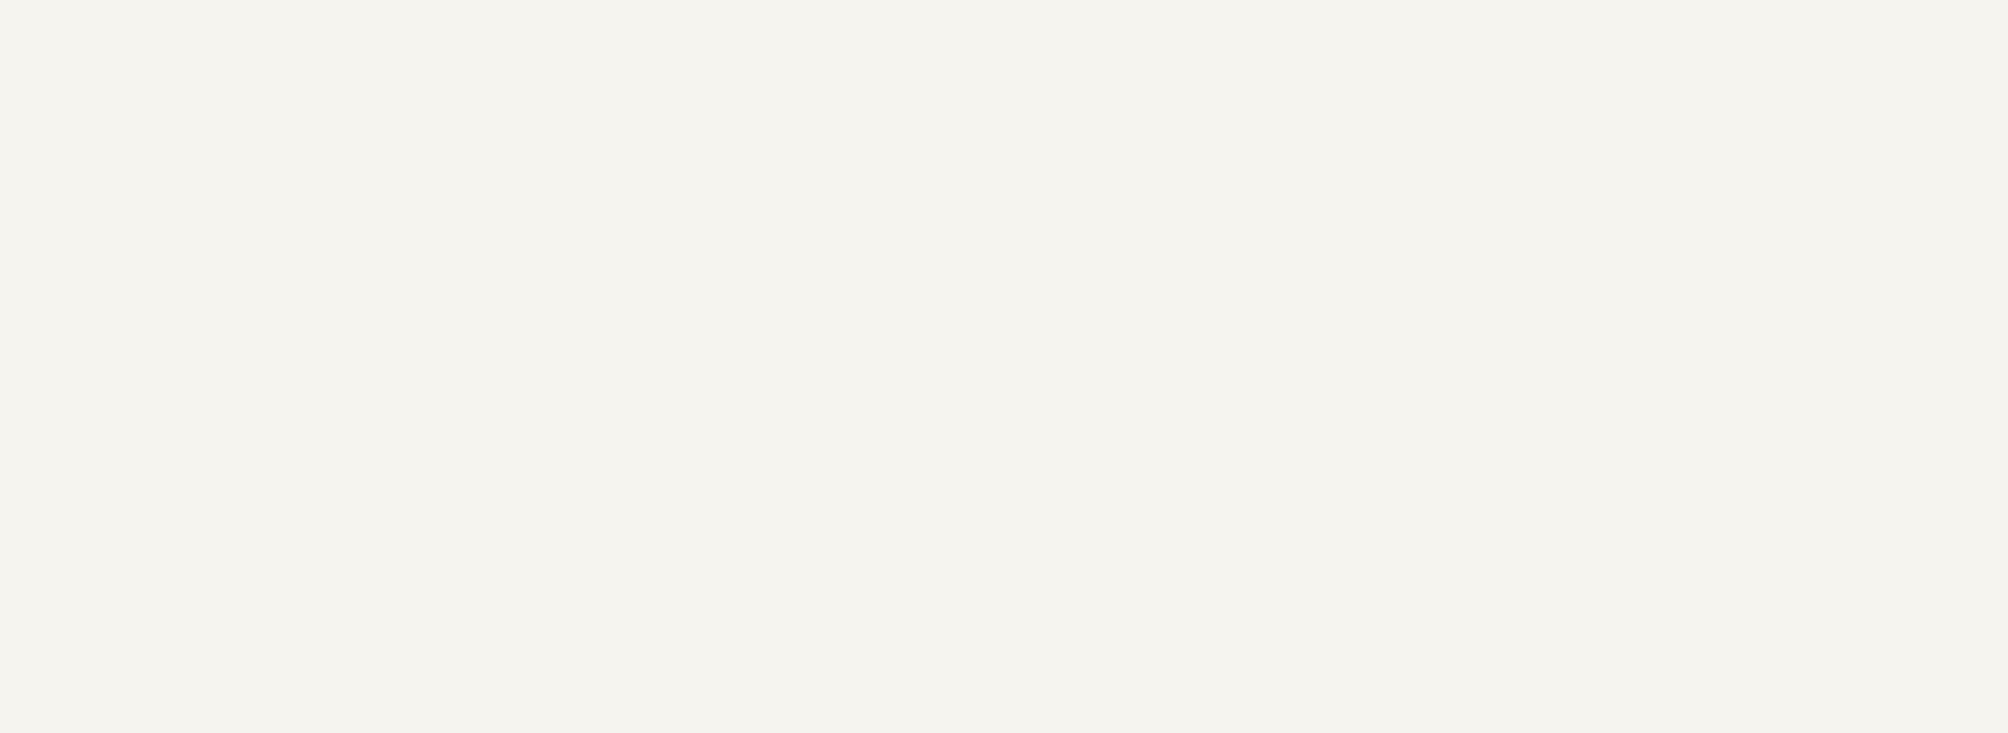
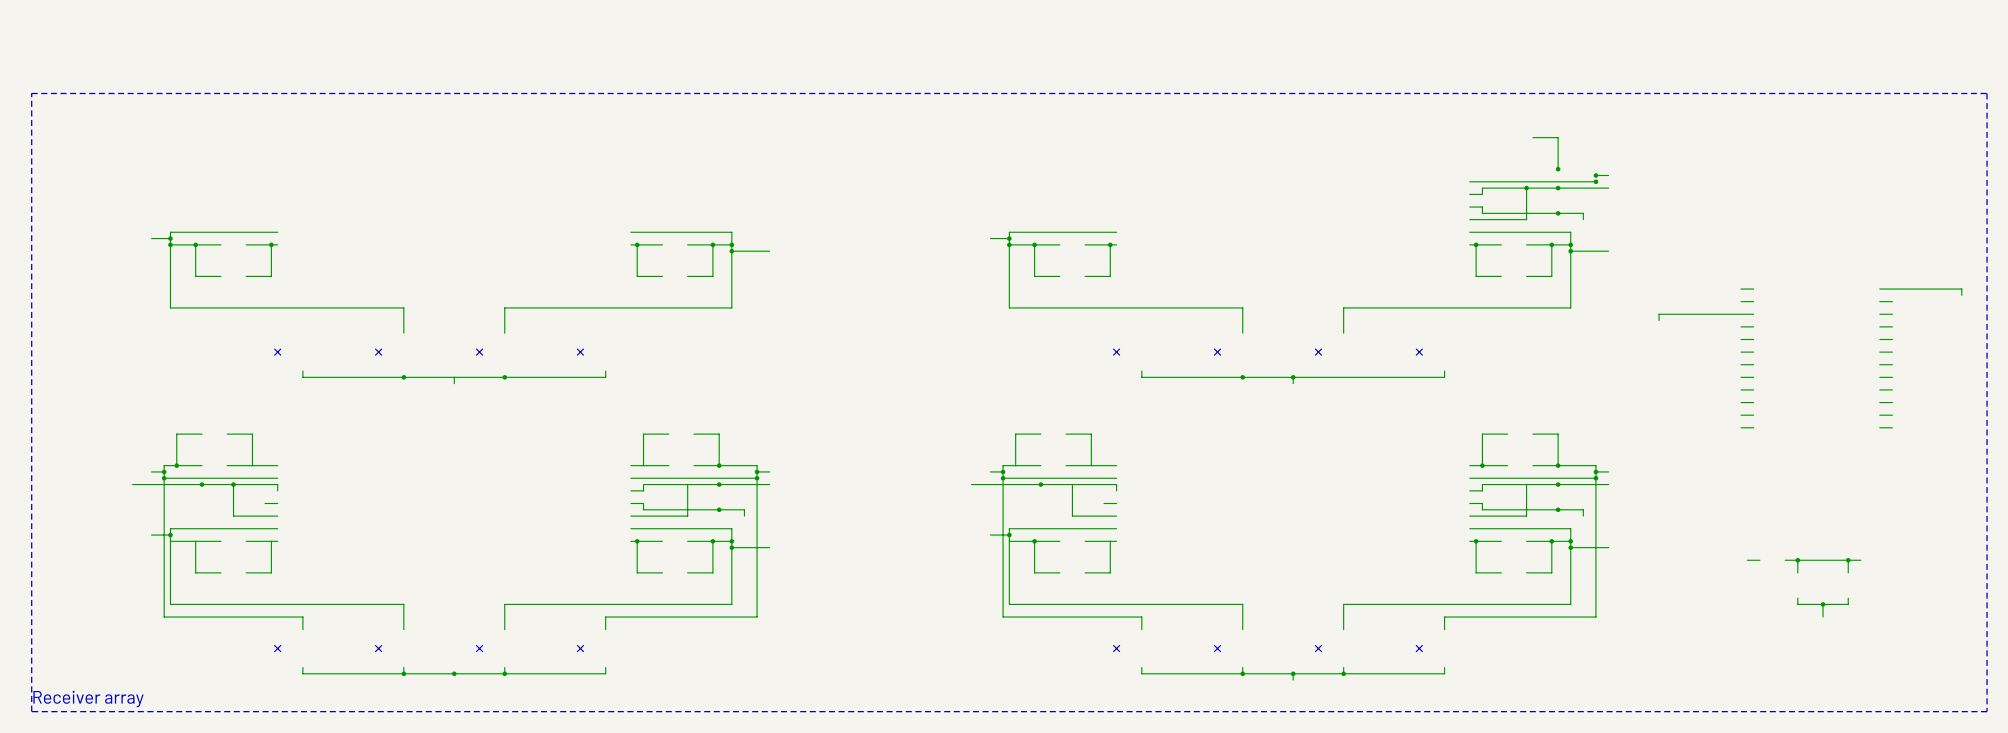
line: none -> (31, 93) (1987, 93) (1987, 711) (31, 711) (31, 93)
wire: none -> (1532, 137) (1558, 137) (1558, 169)
junction: none -> (1558, 169)
wire: none -> (1595, 175) (1608, 175)
junction: none -> (1595, 175)
wire: none -> (1469, 181) (1595, 181)
junction: none -> (1595, 181)
wire: none -> (1526, 188) (1526, 219) (1469, 219)
junction: none -> (1526, 188)
junction: none -> (1558, 188)
wire: none -> (1608, 188) (1482, 188) (1482, 194) (1469, 194)
wire: none -> (1469, 207) (1482, 207) (1482, 213) (1583, 213) (1583, 219)
junction: none -> (1558, 213)
wire: none -> (277, 232) (170, 232) (170, 307) (403, 307) (403, 333)
wire: none -> (630, 232) (731, 232) (731, 307) (504, 307) (504, 333)
wire: none -> (1116, 232) (1009, 232) (1009, 307) (1242, 307) (1242, 333)
wire: none -> (1469, 232) (1570, 232) (1570, 307) (1343, 307) (1343, 333)
wire: none -> (151, 238) (170, 238)
junction: none -> (170, 238)
wire: none -> (990, 238) (1009, 238)
junction: none -> (1009, 238)
wire: none -> (170, 244) (220, 244)
junction: none -> (170, 244)
wire: none -> (195, 244) (195, 276) (220, 276)
junction: none -> (195, 244)
wire: none -> (246, 244) (277, 244)
wire: none -> (271, 244) (271, 276) (246, 276)
junction: none -> (271, 244)
wire: none -> (630, 244) (662, 244)
wire: none -> (637, 244) (637, 276) (662, 276)
junction: none -> (637, 244)
wire: none -> (687, 244) (731, 244)
wire: none -> (712, 244) (712, 276) (687, 276)
junction: none -> (712, 244)
junction: none -> (731, 244)
wire: none -> (1009, 244) (1059, 244)
junction: none -> (1009, 244)
wire: none -> (1034, 244) (1034, 276) (1059, 276)
junction: none -> (1034, 244)
wire: none -> (1085, 244) (1116, 244)
wire: none -> (1110, 244) (1110, 276) (1085, 276)
junction: none -> (1110, 244)
wire: none -> (1469, 244) (1501, 244)
wire: none -> (1476, 244) (1476, 276) (1501, 276)
junction: none -> (1476, 244)
wire: none -> (1526, 244) (1570, 244)
wire: none -> (1551, 244) (1551, 276) (1526, 276)
junction: none -> (1551, 244)
junction: none -> (1570, 244)
wire: none -> (731, 251) (769, 251)
junction: none -> (731, 251)
wire: none -> (1570, 251) (1608, 251)
junction: none -> (1570, 251)
wire: none -> (1741, 289) (1753, 289)
wire: none -> (1879, 289) (1961, 289) (1961, 295)
wire: none -> (1741, 301) (1753, 301)
wire: none -> (1879, 301) (1892, 301)
wire: none -> (1753, 314) (1659, 314) (1659, 320)
wire: none -> (1879, 314) (1892, 314)
wire: none -> (1741, 326) (1753, 326)
wire: none -> (1879, 326) (1892, 326)
wire: none -> (1741, 339) (1753, 339)
wire: none -> (1879, 339) (1892, 339)
no-connect mark: none -> (277, 352)
no-connect mark: none -> (378, 352)
no-connect mark: none -> (479, 352)
no-connect mark: none -> (580, 352)
no-connect mark: none -> (1116, 352)
no-connect mark: none -> (1217, 352)
no-connect mark: none -> (1318, 352)
no-connect mark: none -> (1419, 352)
wire: none -> (1741, 352) (1753, 352)
wire: none -> (1879, 352) (1892, 352)
wire: none -> (1741, 364) (1753, 364)
wire: none -> (1879, 364) (1892, 364)
wire: none -> (302, 371) (302, 377) (605, 377) (605, 371)
wire: none -> (1141, 371) (1141, 377) (1444, 377) (1444, 371)
junction: none -> (403, 377)
wire: none -> (454, 377) (454, 383)
junction: none -> (504, 377)
junction: none -> (1242, 377)
wire: none -> (1293, 377) (1293, 383)
junction: none -> (1293, 377)
wire: none -> (1741, 377) (1753, 377)
wire: none -> (1879, 377) (1892, 377)
wire: none -> (1741, 389) (1753, 389)
wire: none -> (1879, 389) (1892, 389)
wire: none -> (1741, 402) (1753, 402)
wire: none -> (1879, 402) (1892, 402)
wire: none -> (1741, 415) (1753, 415)
wire: none -> (1879, 415) (1892, 415)
wire: none -> (1741, 427) (1753, 427)
wire: none -> (1879, 427) (1892, 427)
wire: none -> (202, 434) (176, 434) (176, 465)
wire: none -> (227, 434) (252, 434) (252, 465)
wire: none -> (668, 434) (643, 434) (643, 465)
wire: none -> (693, 434) (719, 434) (719, 465)
wire: none -> (1040, 434) (1015, 434) (1015, 465)
wire: none -> (1066, 434) (1091, 434) (1091, 465)
wire: none -> (1507, 434) (1482, 434) (1482, 465)
wire: none -> (1532, 434) (1558, 434) (1558, 465)
junction: none -> (176, 465)
wire: none -> (202, 465) (164, 465) (164, 617) (302, 617) (302, 629)
wire: none -> (227, 465) (277, 465)
wire: none -> (630, 465) (668, 465)
wire: none -> (693, 465) (757, 465) (757, 617) (605, 617) (605, 629)
junction: none -> (719, 465)
wire: none -> (1040, 465) (1003, 465) (1003, 617) (1141, 617) (1141, 629)
wire: none -> (1066, 465) (1116, 465)
wire: none -> (1469, 465) (1507, 465)
junction: none -> (1482, 465)
wire: none -> (1532, 465) (1595, 465) (1595, 617) (1444, 617) (1444, 629)
junction: none -> (1558, 465)
wire: none -> (151, 471) (164, 471)
junction: none -> (164, 471)
wire: none -> (757, 471) (769, 471)
junction: none -> (757, 471)
wire: none -> (990, 471) (1003, 471)
junction: none -> (1003, 471)
wire: none -> (1595, 471) (1608, 471)
junction: none -> (1595, 471)
wire: none -> (164, 478) (277, 478)
junction: none -> (164, 478)
wire: none -> (630, 478) (757, 478)
junction: none -> (757, 478)
wire: none -> (1003, 478) (1116, 478)
junction: none -> (1003, 478)
wire: none -> (1469, 478) (1595, 478)
junction: none -> (1595, 478)
wire: none -> (132, 484) (277, 484) (277, 490)
junction: none -> (202, 484)
wire: none -> (233, 484) (233, 516) (277, 516)
junction: none -> (233, 484)
wire: none -> (687, 484) (687, 516) (630, 516)
junction: none -> (719, 484)
wire: none -> (769, 484) (643, 484) (643, 490) (630, 490)
wire: none -> (971, 484) (1116, 484) (1116, 490)
junction: none -> (1040, 484)
wire: none -> (1072, 484) (1072, 516) (1116, 516)
wire: none -> (1526, 484) (1526, 516) (1469, 516)
junction: none -> (1558, 484)
wire: none -> (1608, 484) (1482, 484) (1482, 490) (1469, 490)
wire: none -> (265, 503) (277, 503)
wire: none -> (630, 503) (643, 503) (643, 509) (744, 509) (744, 516)
wire: none -> (1103, 503) (1116, 503)
wire: none -> (1469, 503) (1482, 503) (1482, 509) (1583, 509) (1583, 516)
junction: none -> (719, 509)
junction: none -> (1558, 509)
wire: none -> (277, 528) (170, 528) (170, 604) (403, 604) (403, 629)
wire: none -> (630, 528) (731, 528) (731, 604) (504, 604) (504, 629)
wire: none -> (1116, 528) (1009, 528) (1009, 604) (1242, 604) (1242, 629)
wire: none -> (1469, 528) (1570, 528) (1570, 604) (1343, 604) (1343, 629)
wire: none -> (151, 535) (170, 535)
junction: none -> (170, 535)
wire: none -> (990, 535) (1009, 535)
junction: none -> (1009, 535)
wire: none -> (170, 541) (220, 541)
wire: none -> (195, 541) (195, 572) (220, 572)
wire: none -> (246, 541) (277, 541)
wire: none -> (271, 541) (271, 572) (246, 572)
wire: none -> (630, 541) (662, 541)
wire: none -> (637, 541) (637, 572) (662, 572)
junction: none -> (637, 541)
wire: none -> (687, 541) (731, 541)
wire: none -> (712, 541) (712, 572) (687, 572)
junction: none -> (712, 541)
junction: none -> (731, 541)
wire: none -> (1009, 541) (1059, 541)
wire: none -> (1034, 541) (1034, 572) (1059, 572)
junction: none -> (1034, 541)
wire: none -> (1085, 541) (1116, 541)
wire: none -> (1110, 541) (1110, 572) (1085, 572)
wire: none -> (1469, 541) (1501, 541)
wire: none -> (1476, 541) (1476, 572) (1501, 572)
junction: none -> (1476, 541)
wire: none -> (1526, 541) (1570, 541)
wire: none -> (1551, 541) (1551, 572) (1526, 572)
junction: none -> (1551, 541)
junction: none -> (1570, 541)
wire: none -> (731, 547) (769, 547)
junction: none -> (731, 547)
wire: none -> (1570, 547) (1608, 547)
junction: none -> (1570, 547)
wire: none -> (1747, 560) (1759, 560)
wire: none -> (1785, 560) (1860, 560)
wire: none -> (1797, 560) (1797, 572)
junction: none -> (1797, 560)
wire: none -> (1848, 560) (1848, 572)
junction: none -> (1848, 560)
wire: none -> (1797, 598) (1797, 604) (1848, 604) (1848, 598)
wire: none -> (1823, 604) (1823, 617)
junction: none -> (1823, 604)
no-connect mark: none -> (277, 648)
no-connect mark: none -> (378, 648)
no-connect mark: none -> (479, 648)
no-connect mark: none -> (580, 648)
no-connect mark: none -> (1116, 648)
no-connect mark: none -> (1217, 648)
no-connect mark: none -> (1318, 648)
no-connect mark: none -> (1419, 648)
wire: none -> (302, 667) (302, 673) (605, 673) (605, 667)
wire: none -> (403, 667) (403, 673)
wire: none -> (504, 667) (504, 673)
wire: none -> (1141, 667) (1141, 673) (1444, 673) (1444, 667)
wire: none -> (1242, 667) (1242, 673)
wire: none -> (1343, 667) (1343, 673)
junction: none -> (403, 673)
junction: none -> (454, 673)
junction: none -> (504, 673)
junction: none -> (1242, 673)
wire: none -> (1293, 673) (1293, 680)
junction: none -> (1293, 673)
junction: none -> (1343, 673)
text: none -> Receiver array (88, 699)

